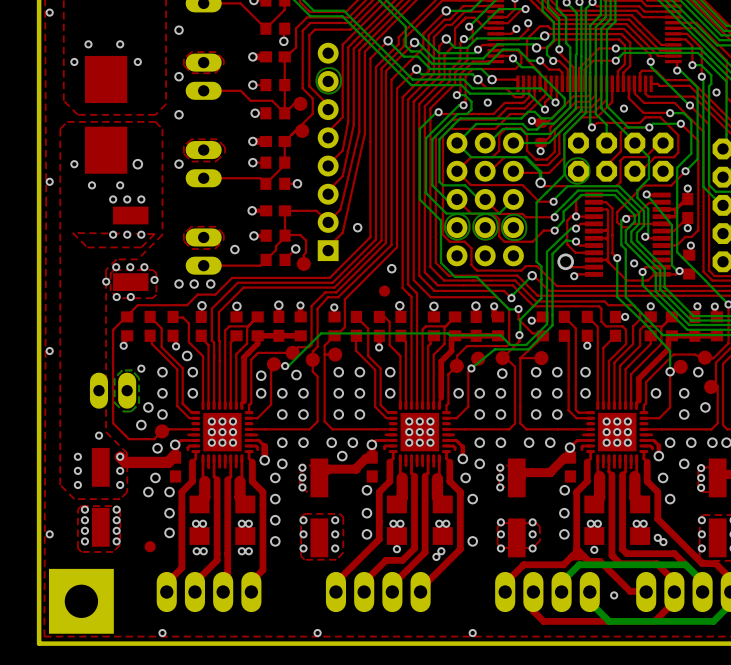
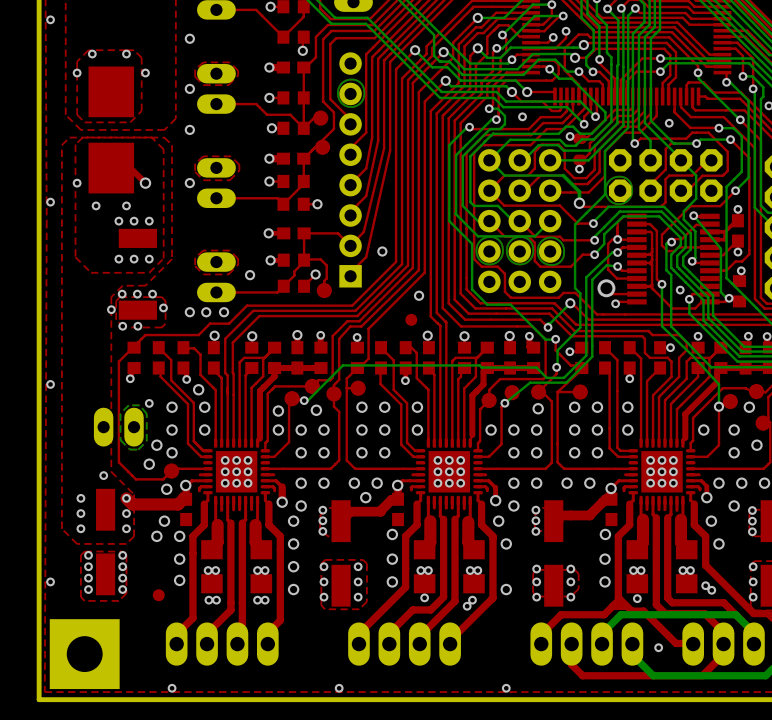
top zone outline: none -> (134, 50) (88, 50) (77, 61) (77, 114) (84, 122) (130, 122) (141, 110) (141, 57) (134, 50)
top track: none -> (130, 168) (145, 183)
top zone outline: (72, 232) (154, 234) -> (75, 257) (75, 144) (82, 137) (151, 137) (163, 149) (163, 258)

